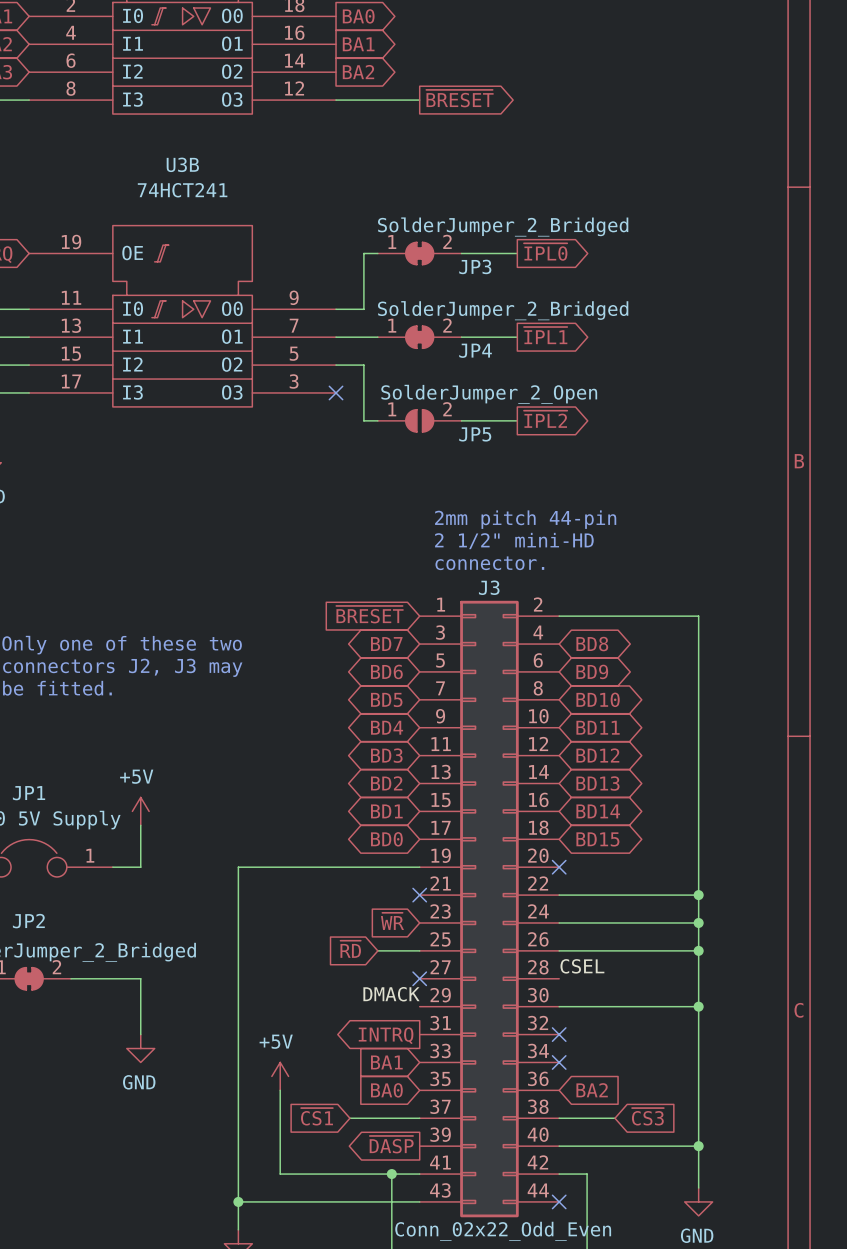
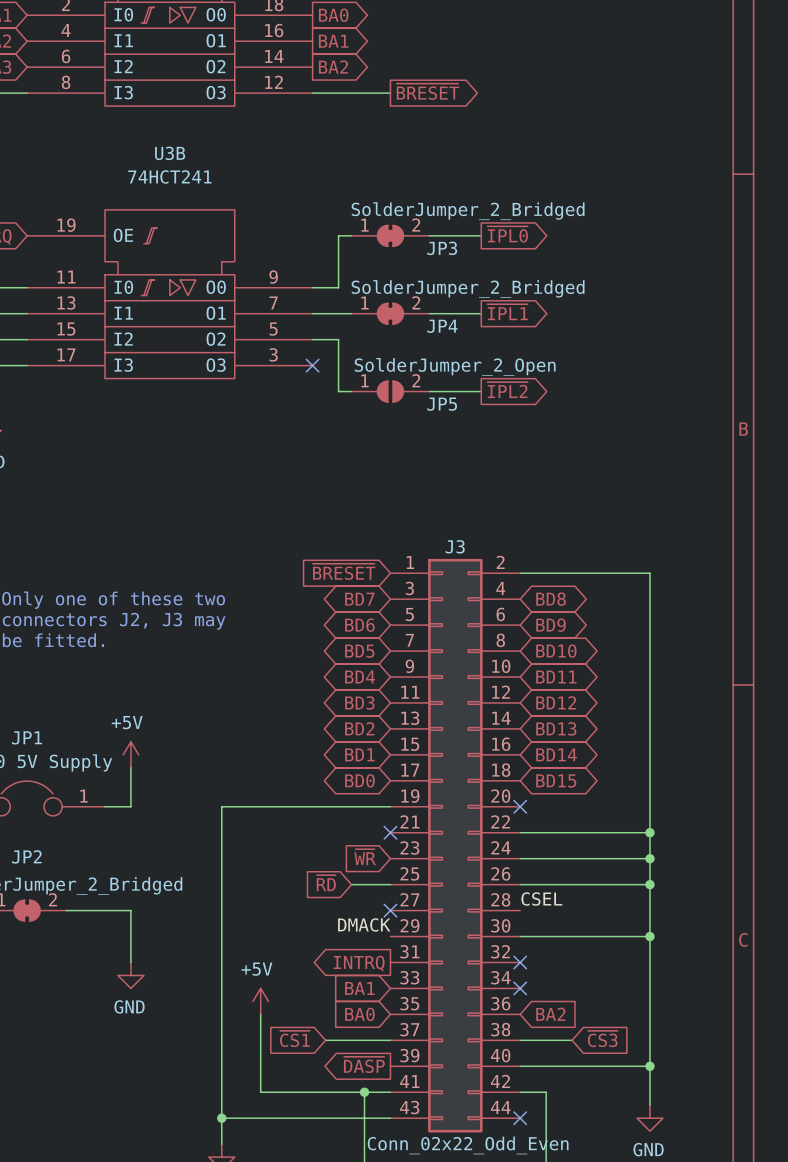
text: 2mm pitch 44-pin (525, 519) -> none
text: 2 1/2" mini-HD (514, 541) -> none
text: connector. (489, 563) -> none

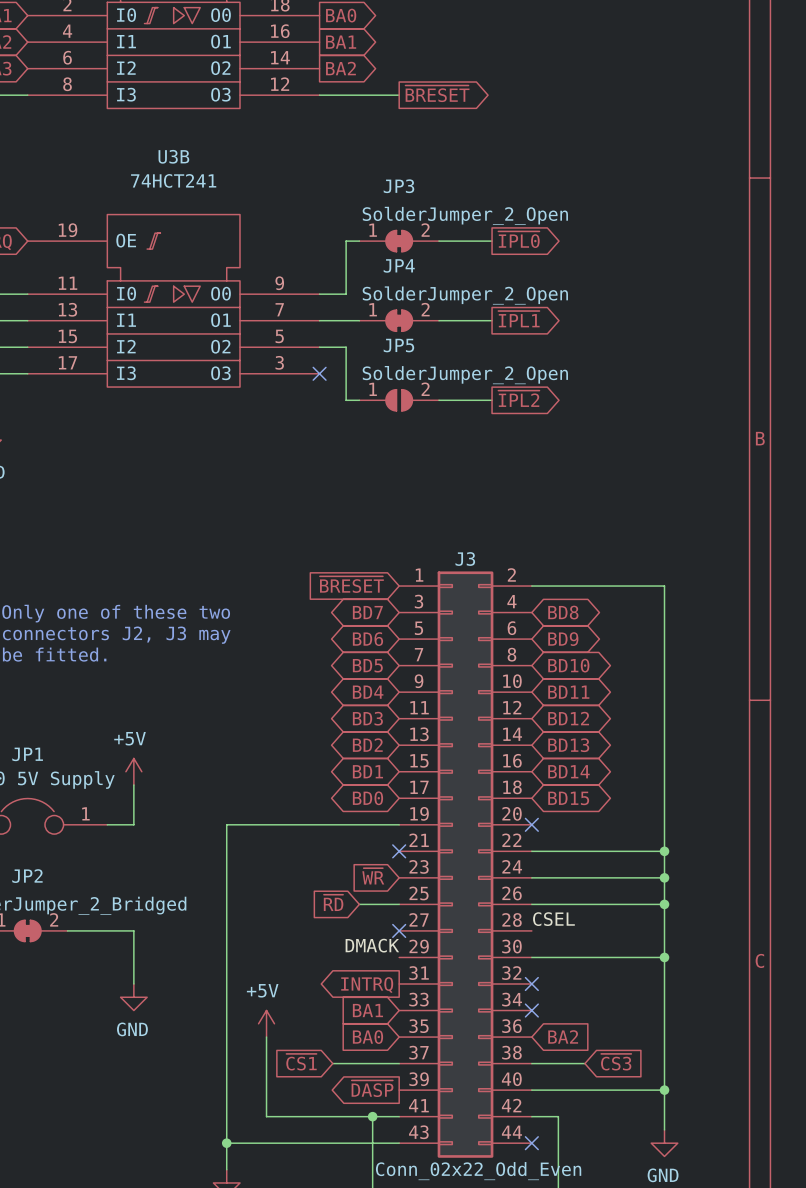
JP3 value: SolderJumper_2_Bridged (468, 211) -> SolderJumper_2_Open (465, 215)
JP3 name position: JP3 (442, 248) -> JP3 (398, 186)
JP4 value: SolderJumper_2_Bridged (468, 289) -> SolderJumper_2_Open (465, 295)
JP4 name position: JP4 (442, 326) -> JP4 (399, 265)
JP5 name position: JP5 (442, 404) -> JP5 (398, 345)

